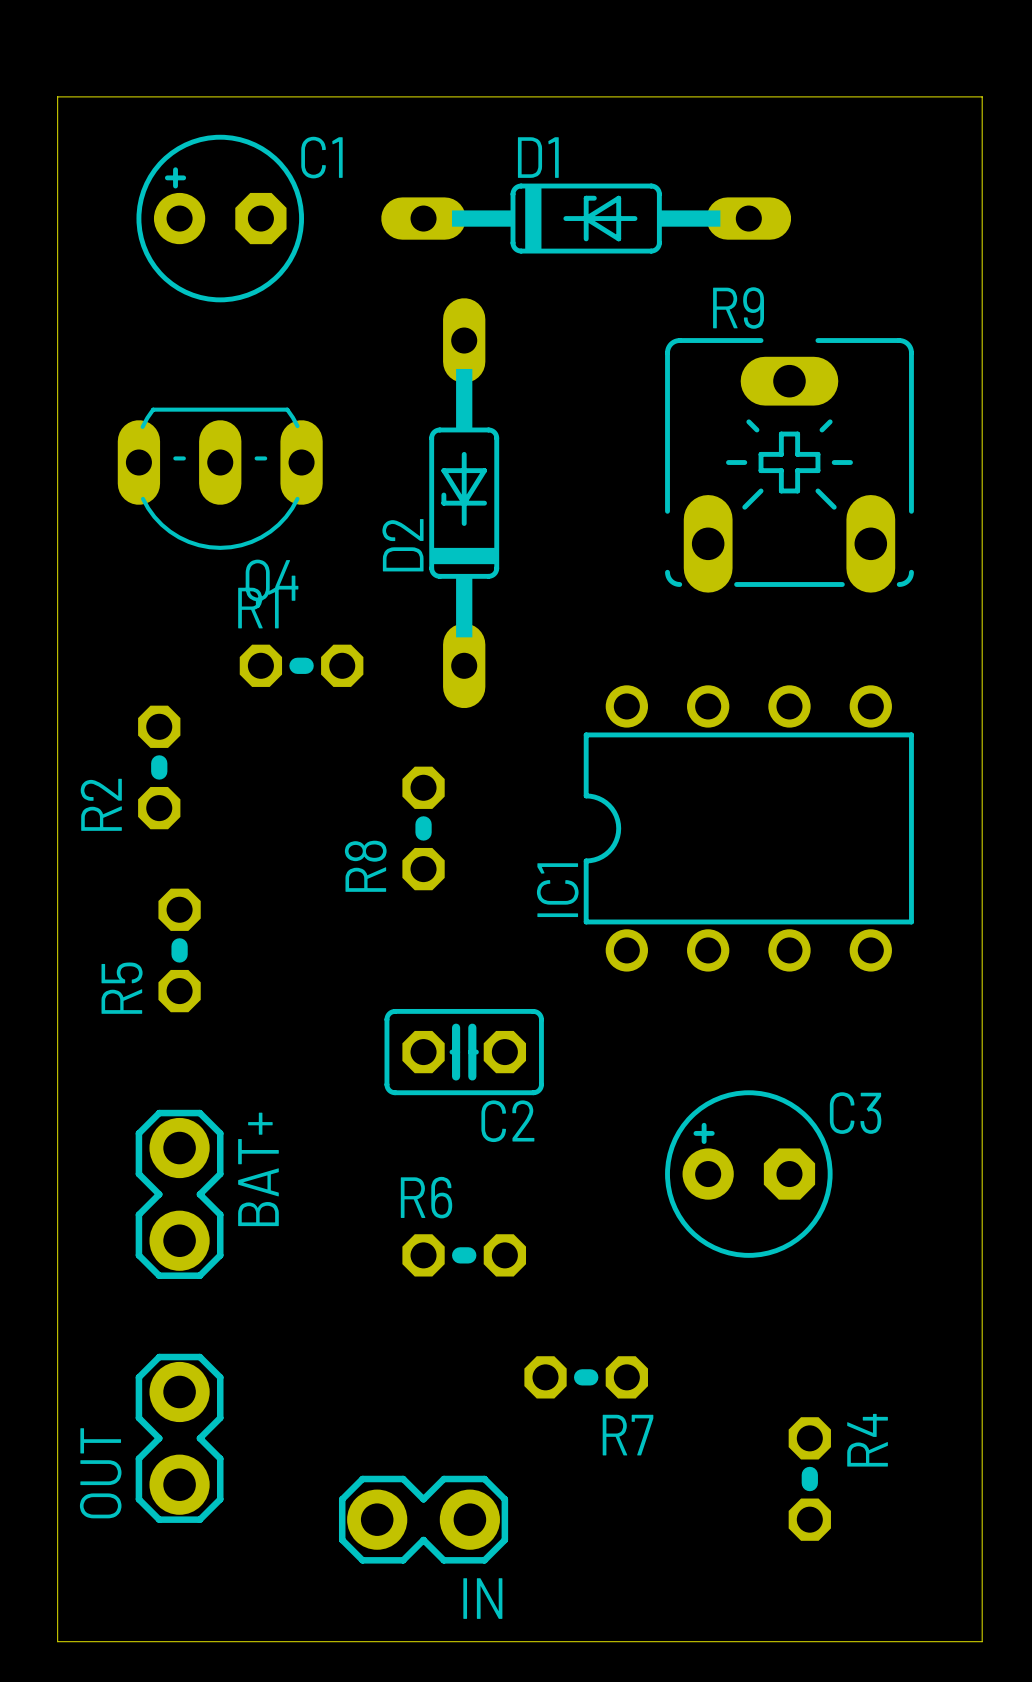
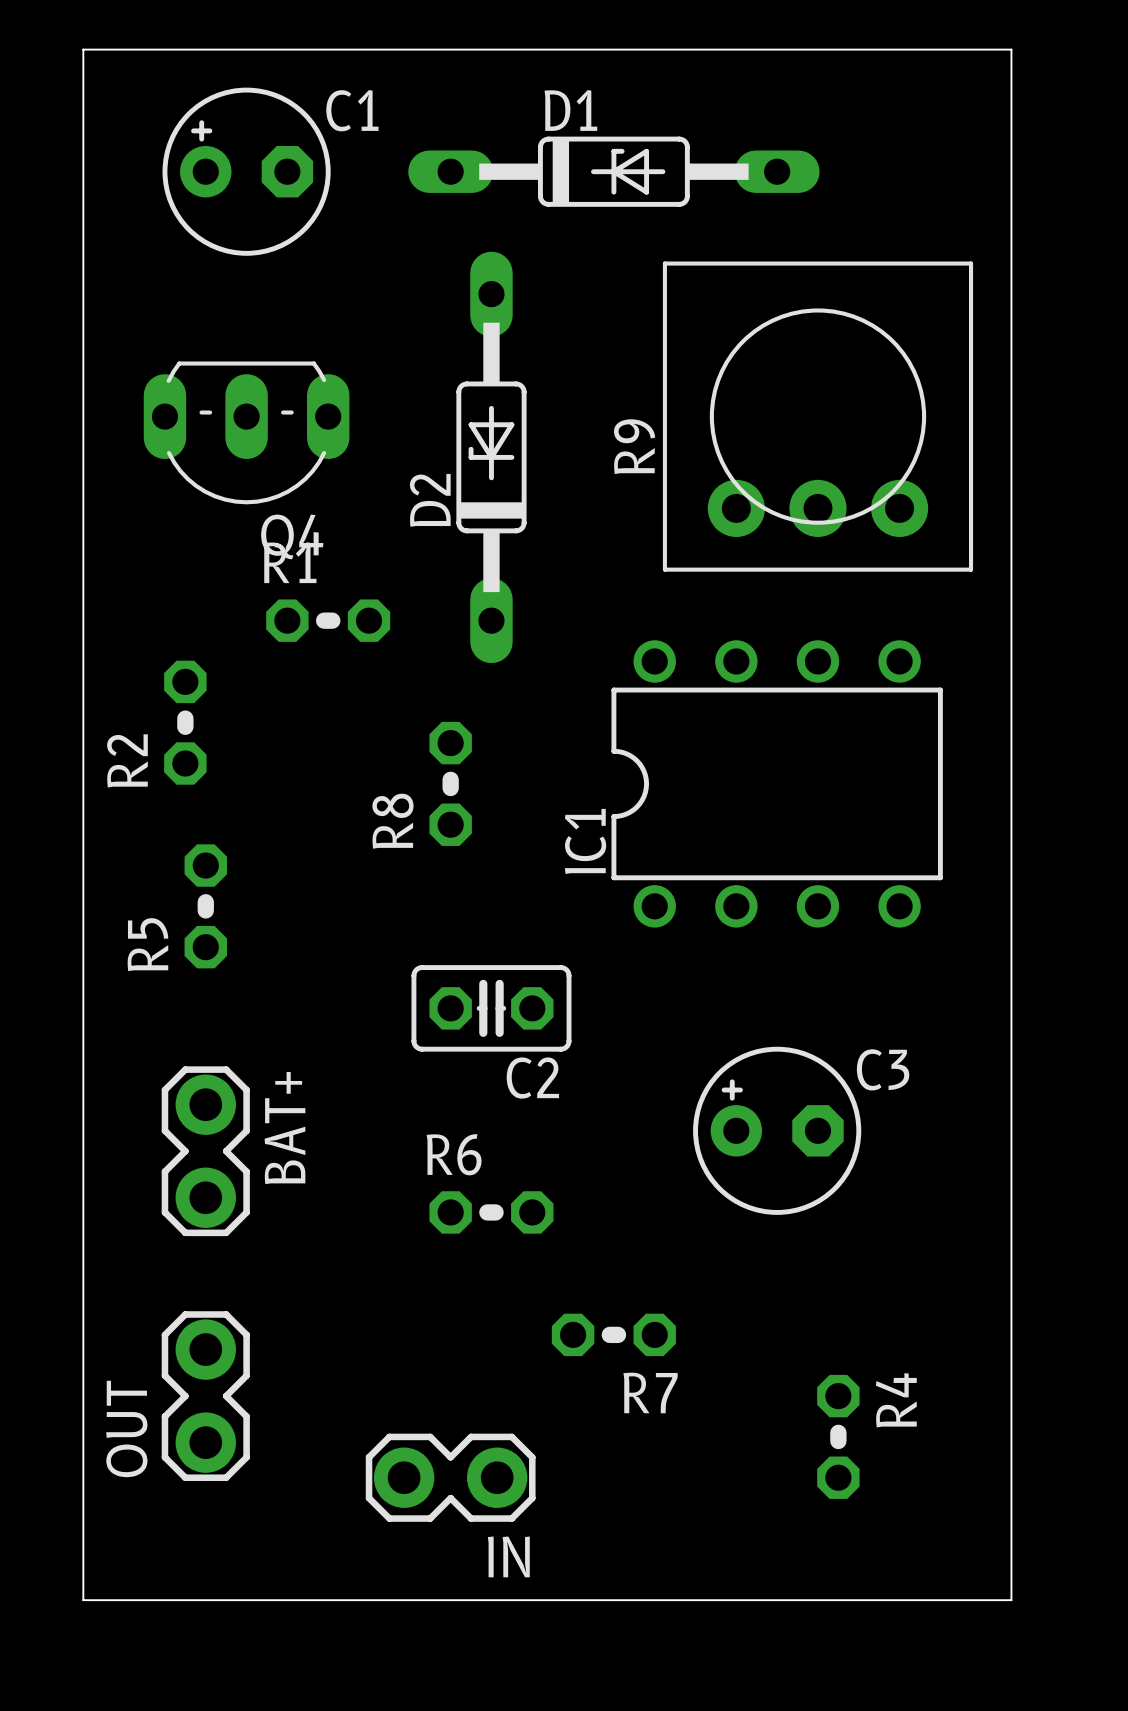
R9 name position: R9 (738, 308) -> R9 (634, 446)
R9 footprint: [665, 338, 914, 593] -> [662, 261, 974, 572]

